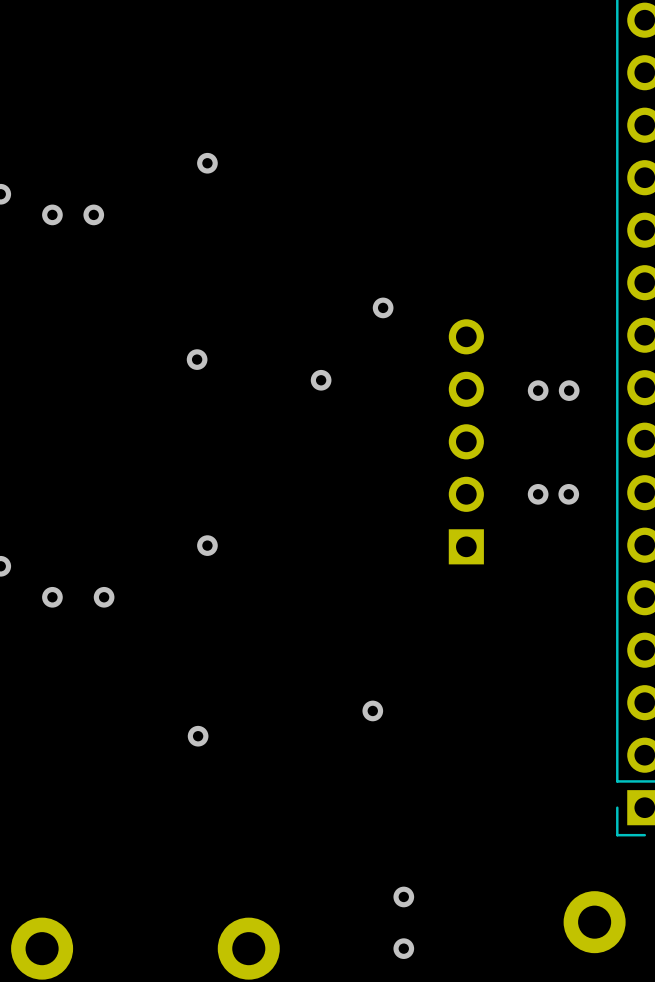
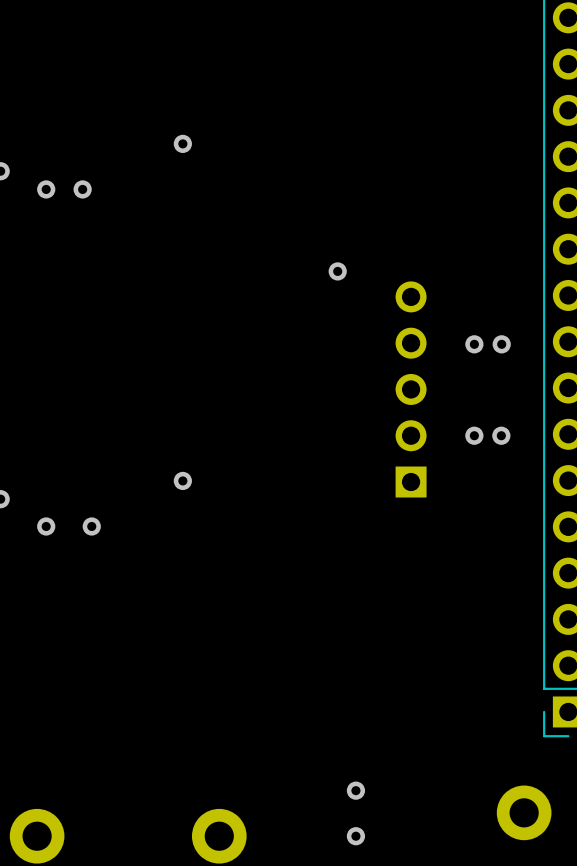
via: (197, 359) -> none
via: (321, 380) -> none
via: (372, 710) -> none
via: (198, 736) -> none

